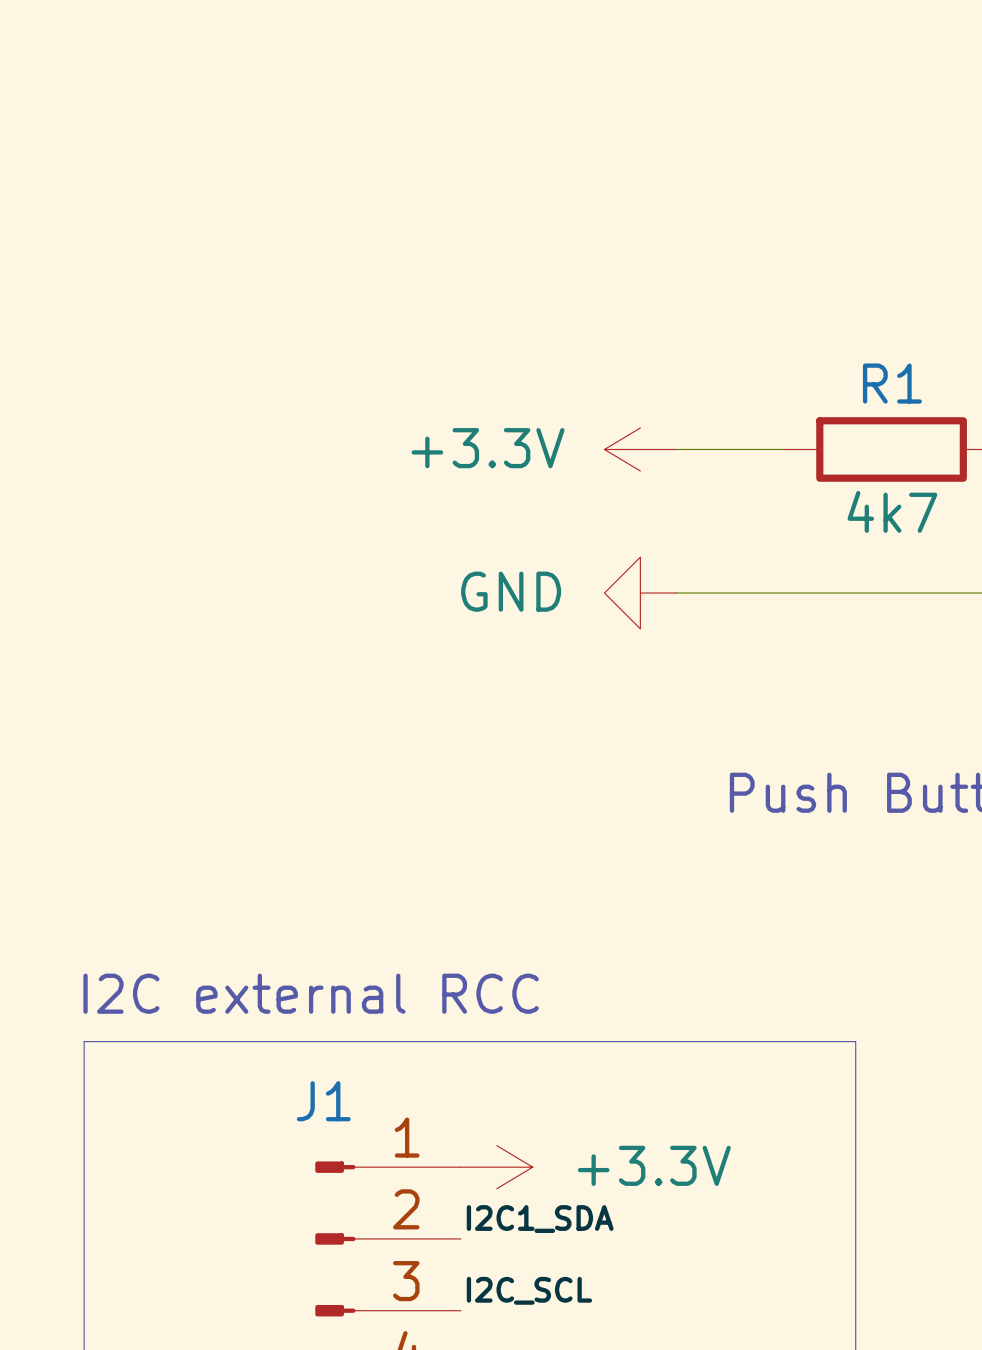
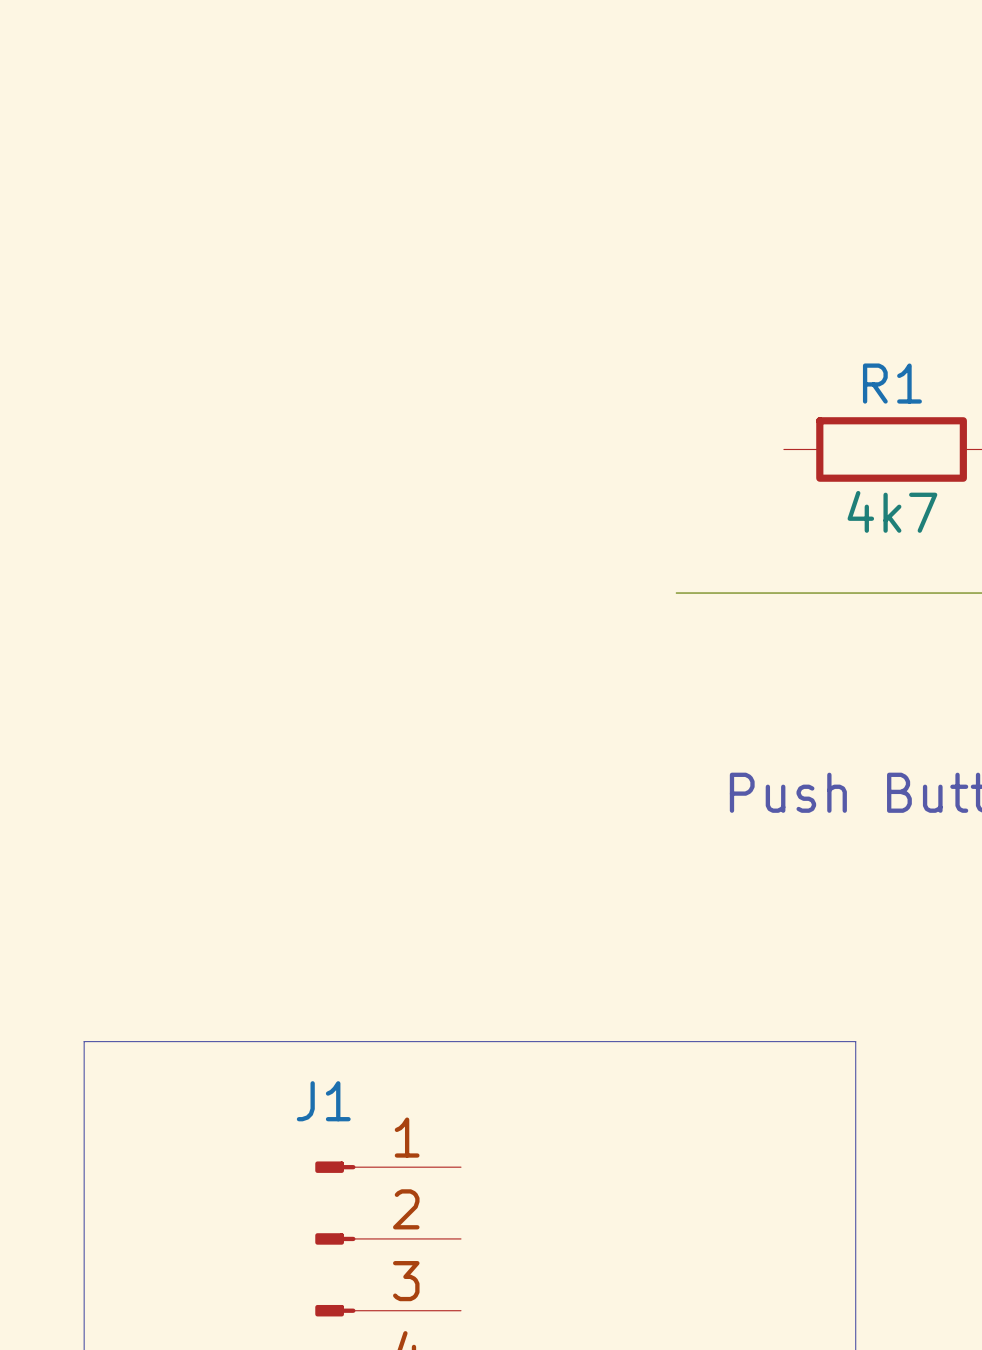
power symbol: +3.3V (640, 449) -> none
wire: (676, 449) (783, 449) -> none
power symbol: GND (640, 593) -> none
text: I2C external RCC (311, 993) -> none
power symbol: +3.3V (496, 1167) -> none
label: I2C1_SDA (540, 1219) -> none
label: I2C_SCL (529, 1290) -> none

